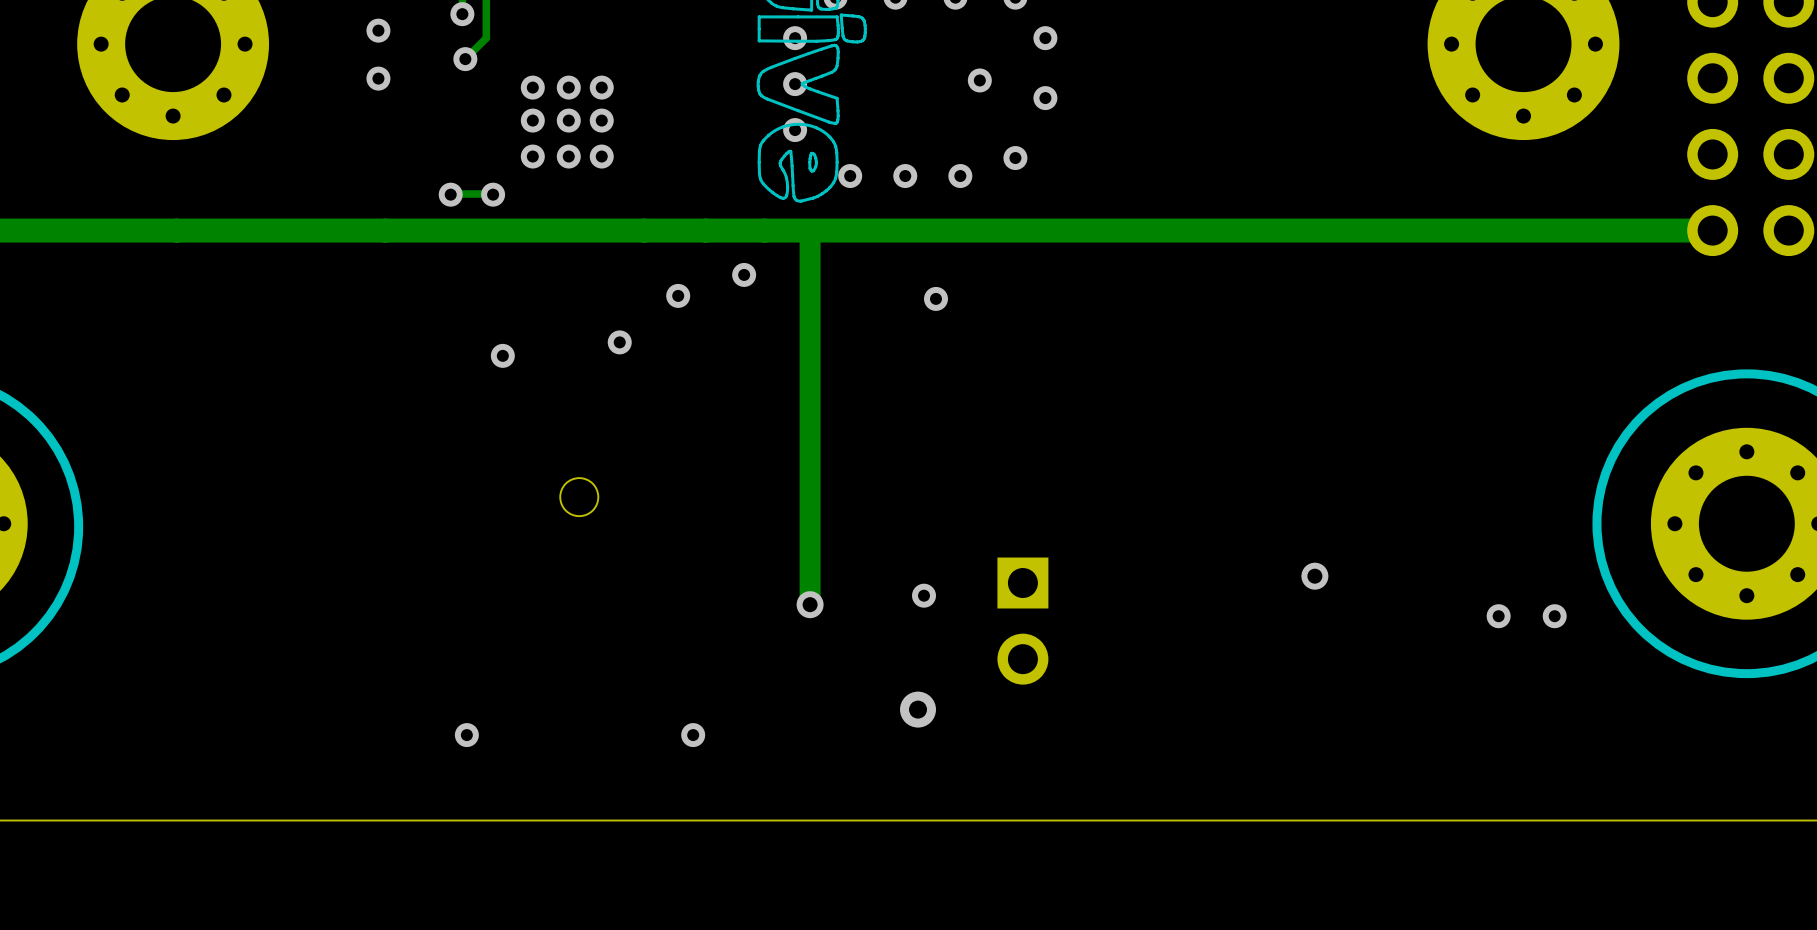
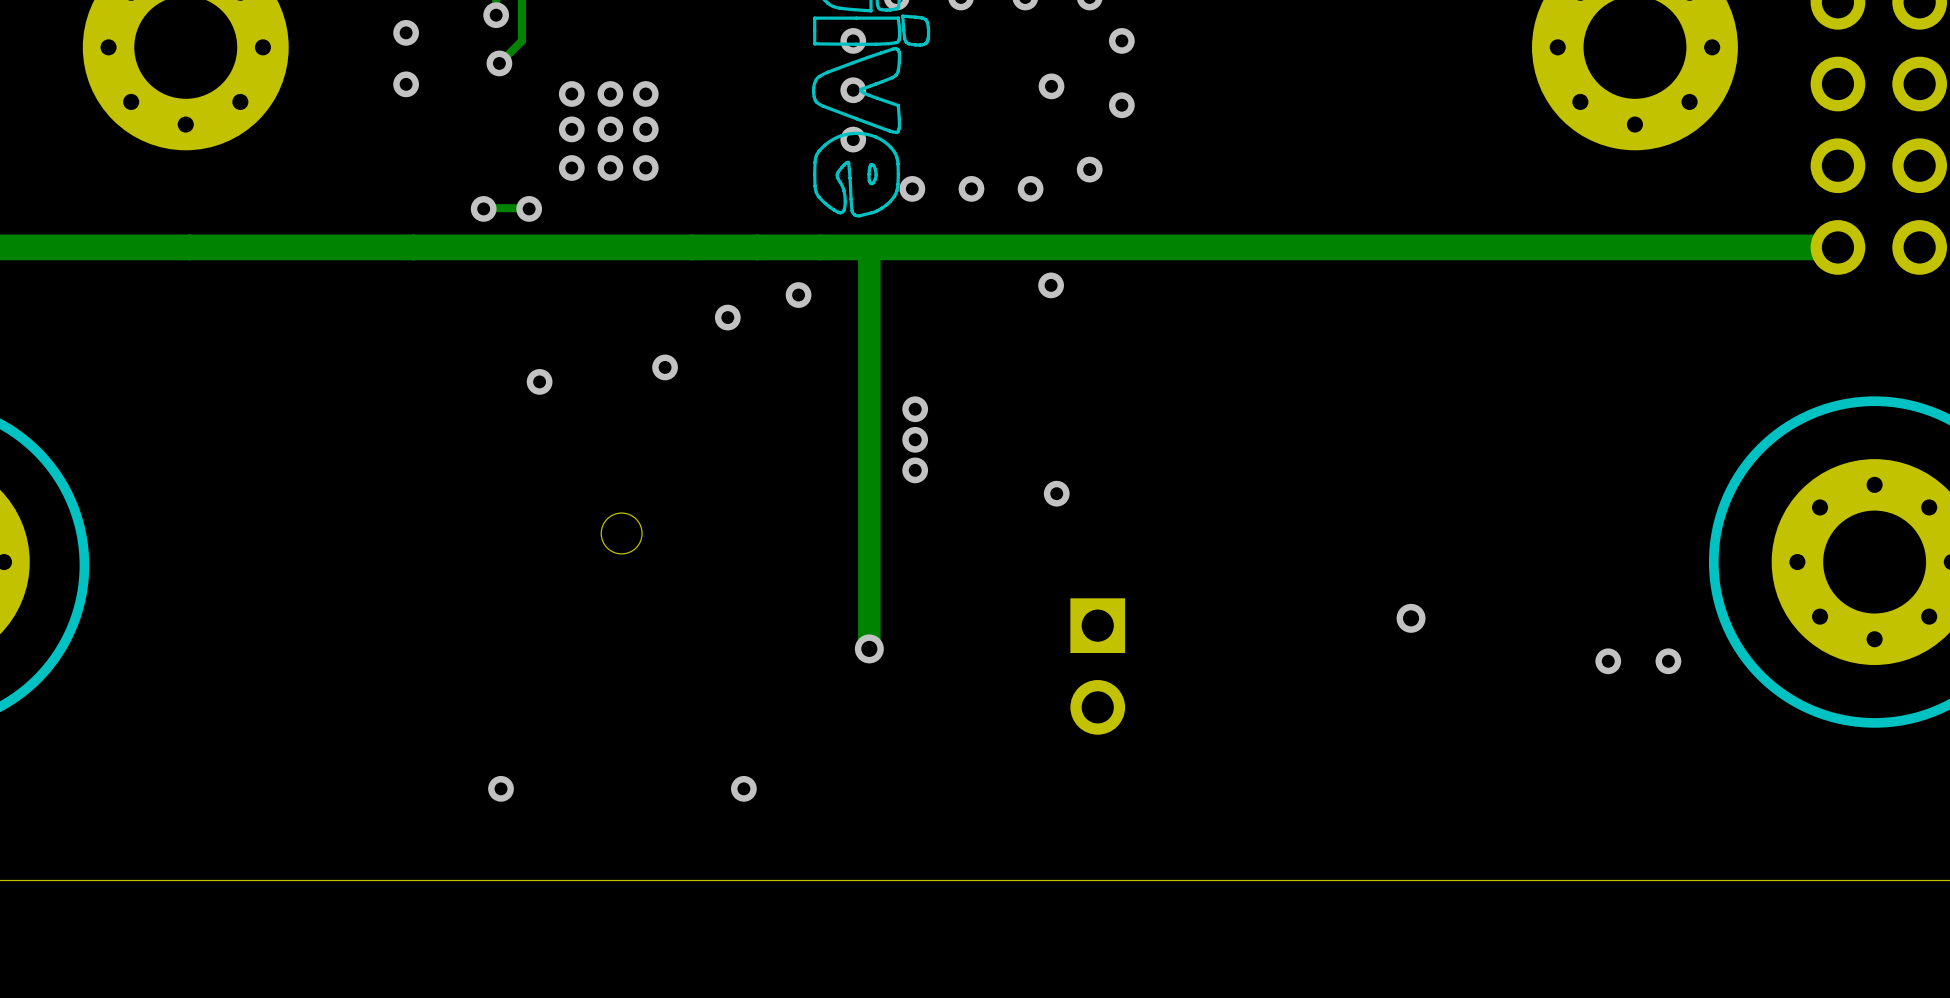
via position: (935, 298) -> (1051, 285)
via: none -> (915, 409)
via: none -> (915, 439)
via: none -> (915, 470)
via: none -> (1056, 493)
via: (924, 595) -> none
via: (918, 709) -> none

